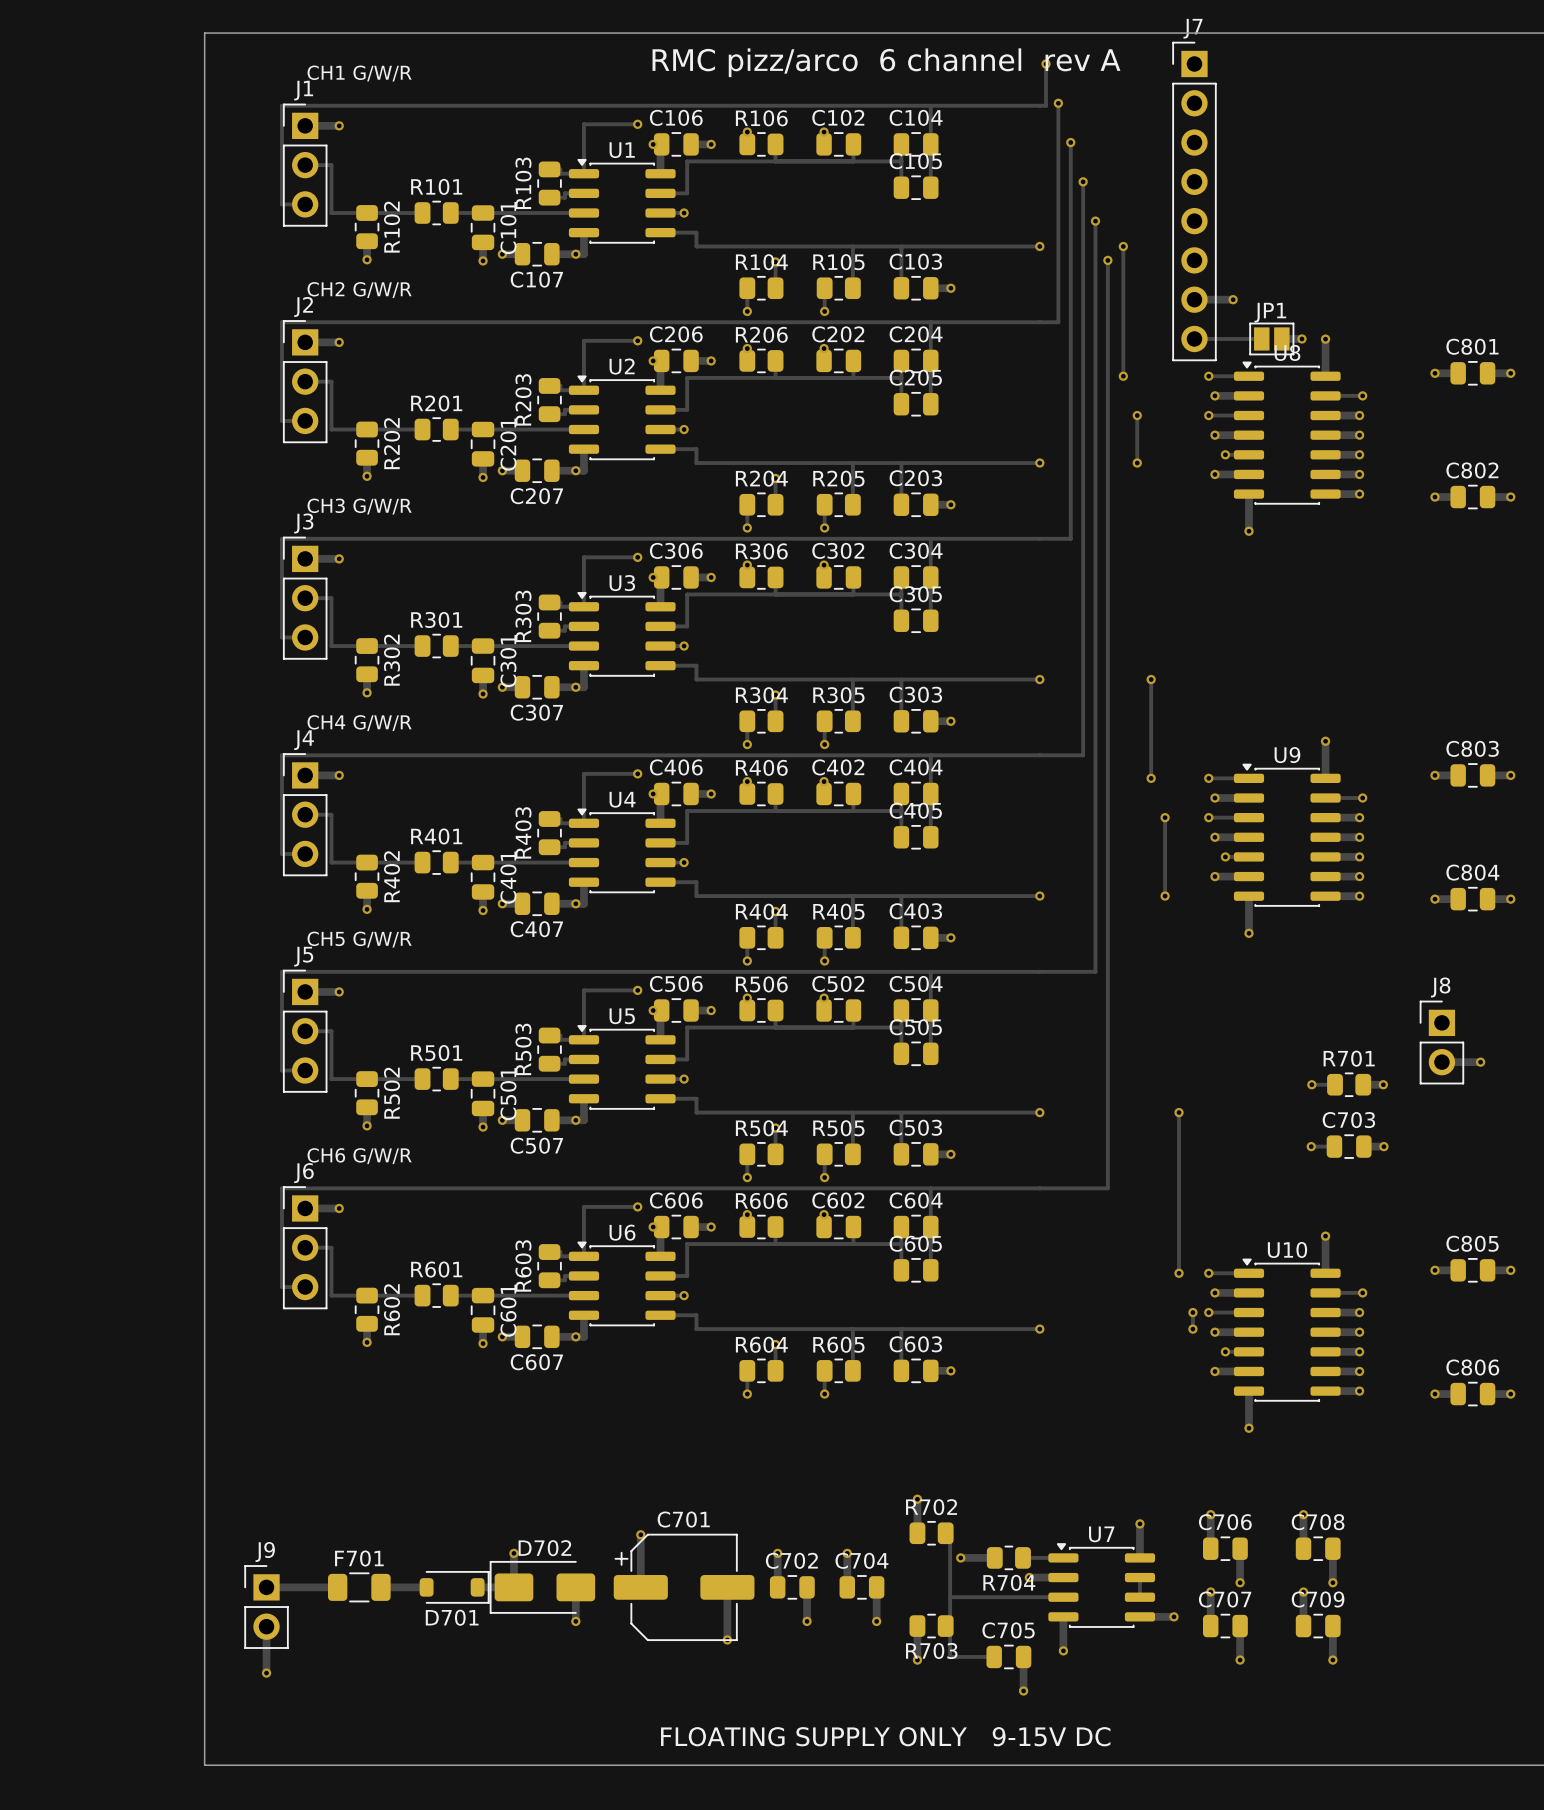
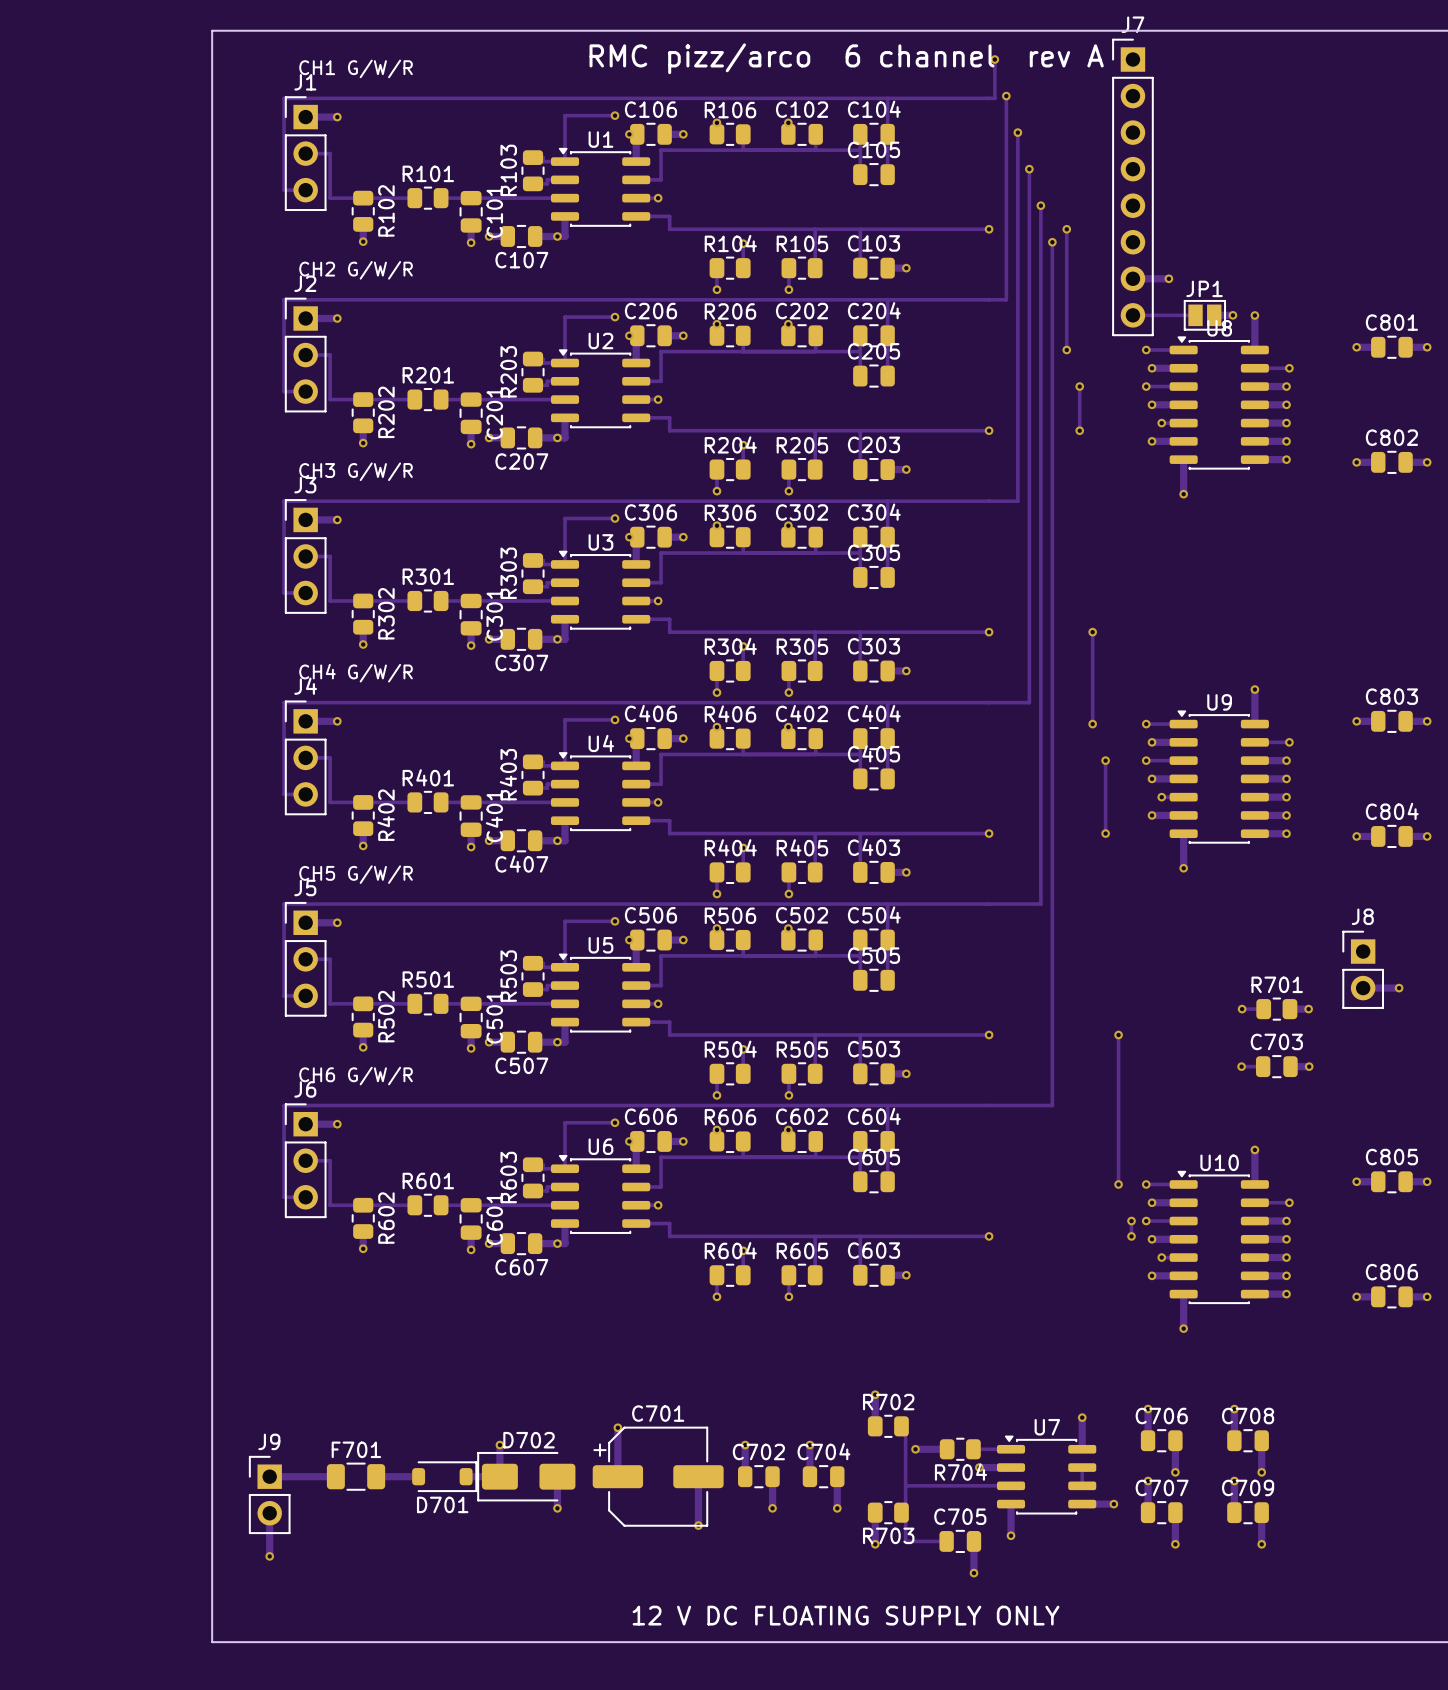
text: FLOATING SUPPLY ONLY 9-15V DC (885, 1736) -> 12 V DC FLOATING SUPPLY ONLY (846, 1615)

